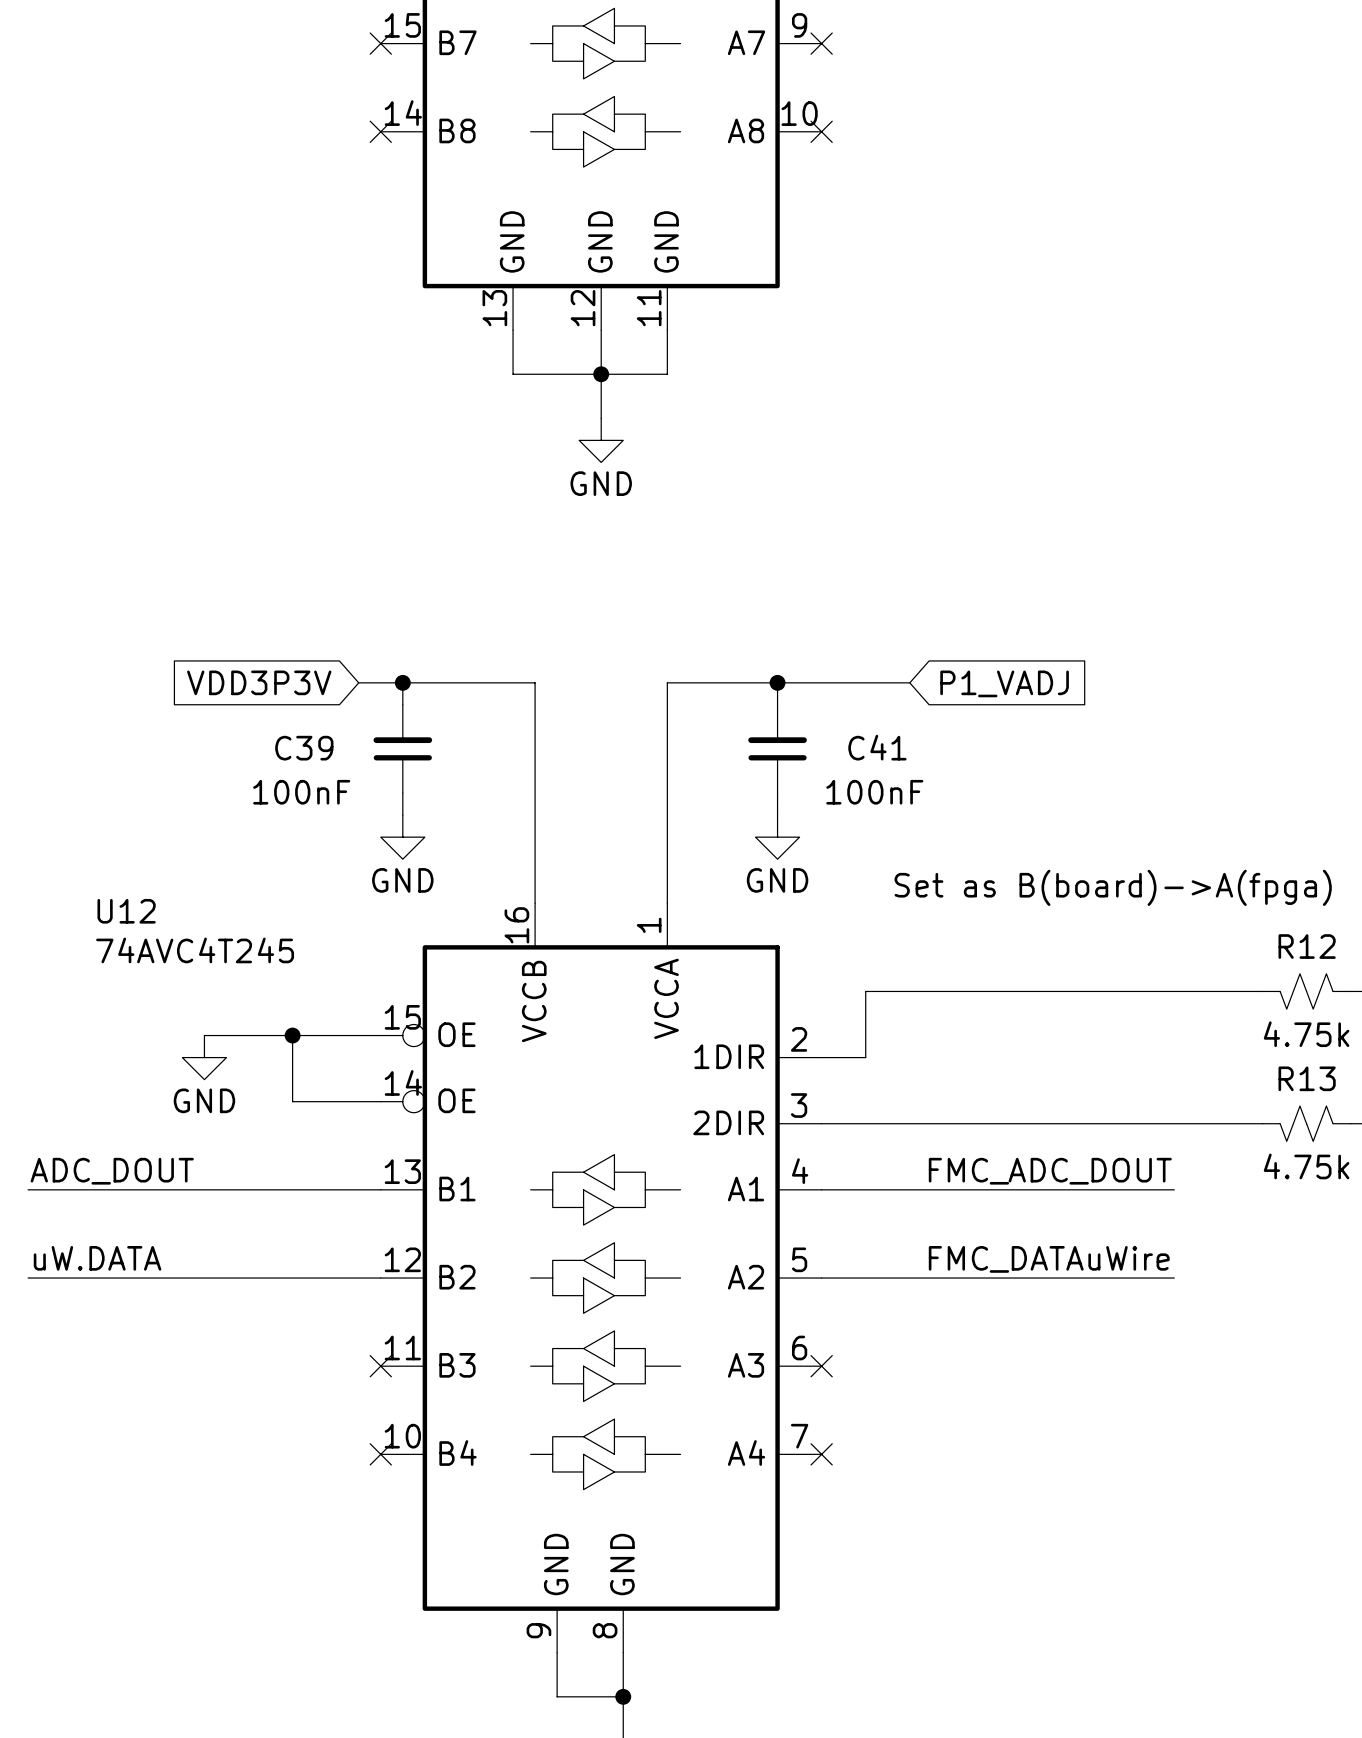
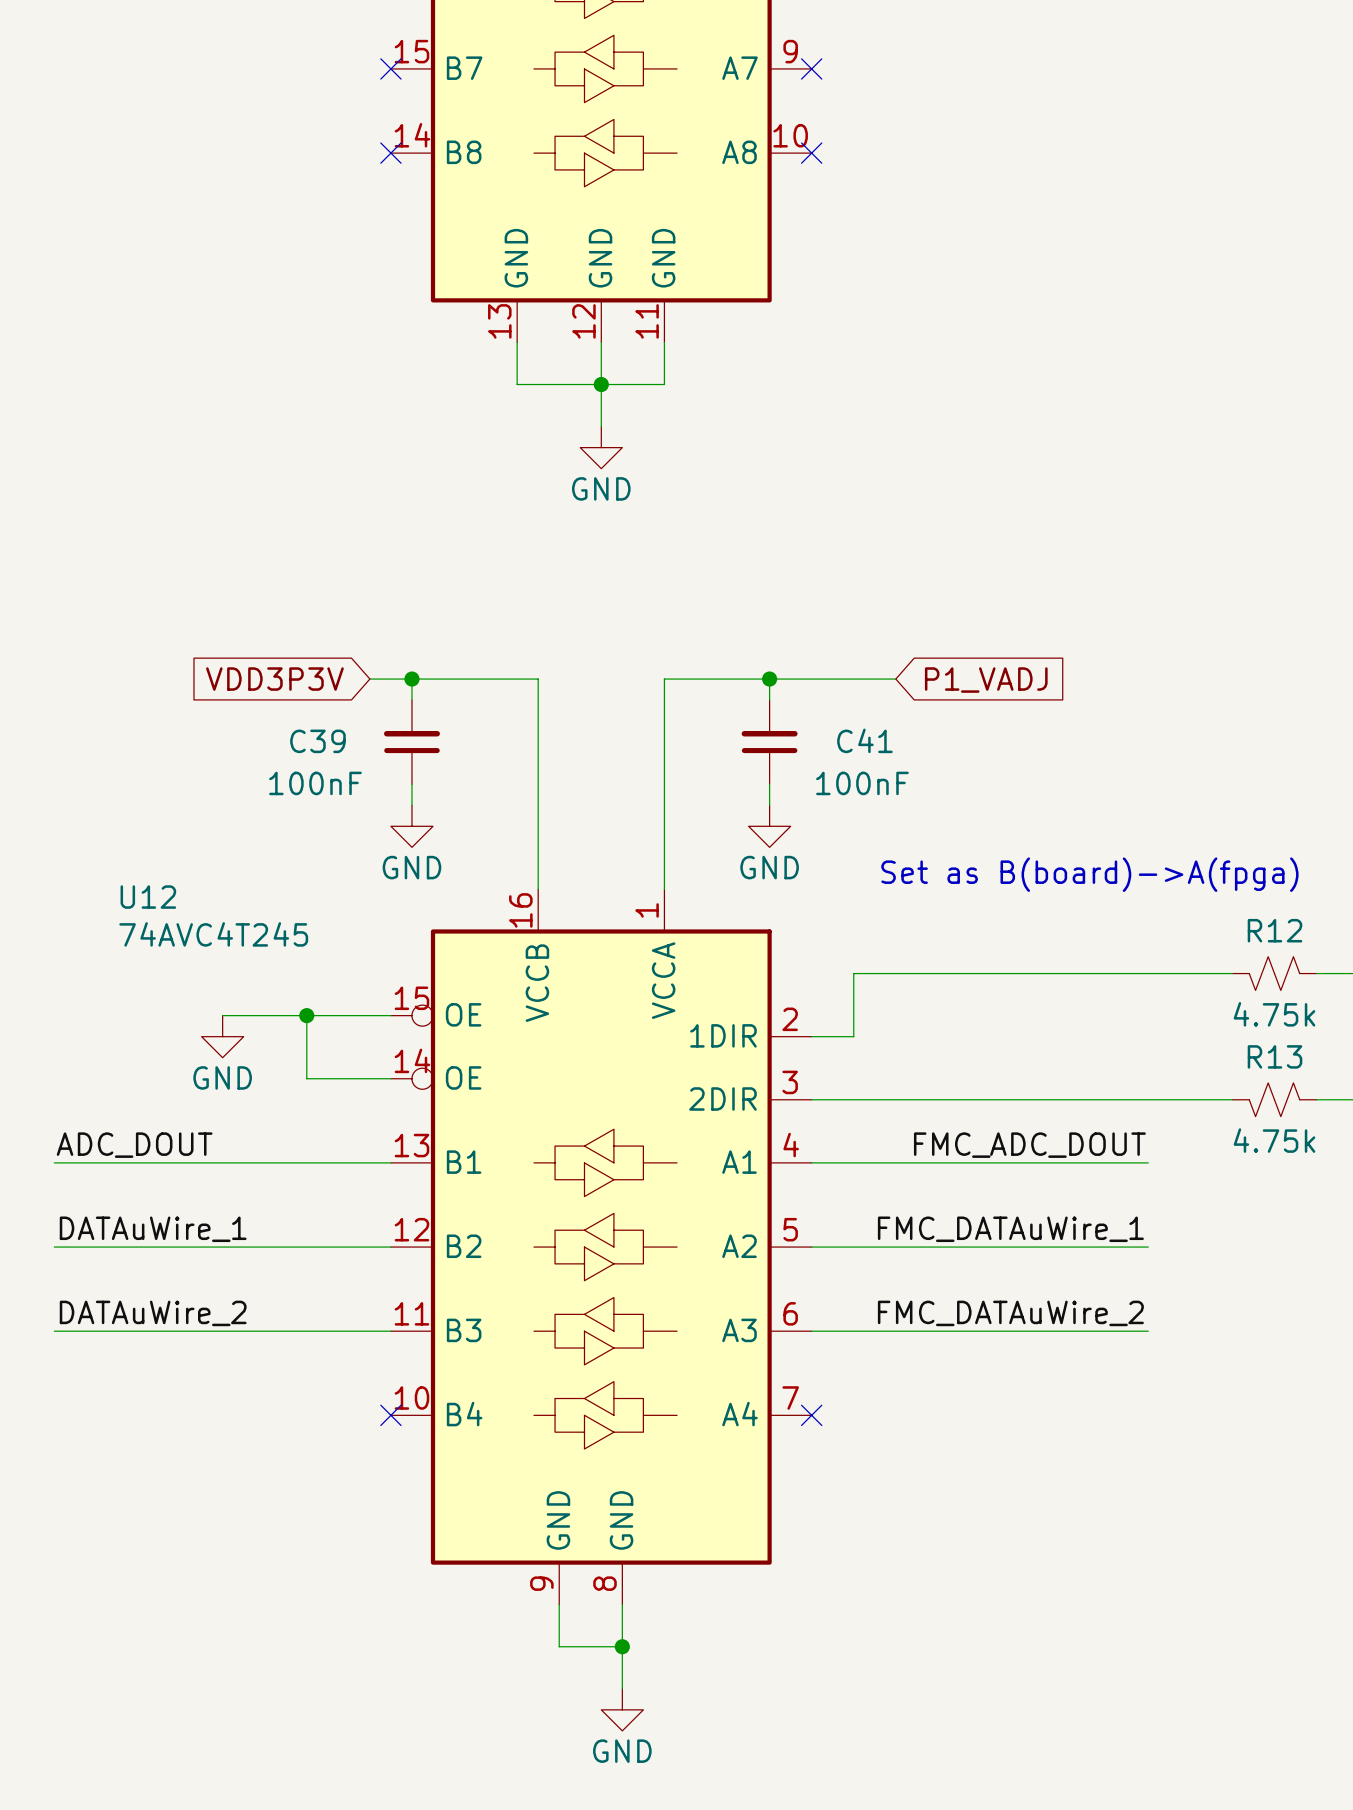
label: uW.DATA (97, 1258) -> DATAuWire_1 (153, 1229)
label: FMC_DATAuWire (1049, 1259) -> FMC_DATAuWire_1 (1010, 1229)
label: none -> DATAuWire_2 (153, 1313)
label: none -> FMC_DATAuWire_2 (1010, 1313)
wire: none -> (54, 1331) (390, 1331)
no-connect mark: (380, 1366) -> none
wire: none -> (811, 1331) (1148, 1331)
no-connect mark: (821, 1366) -> none

